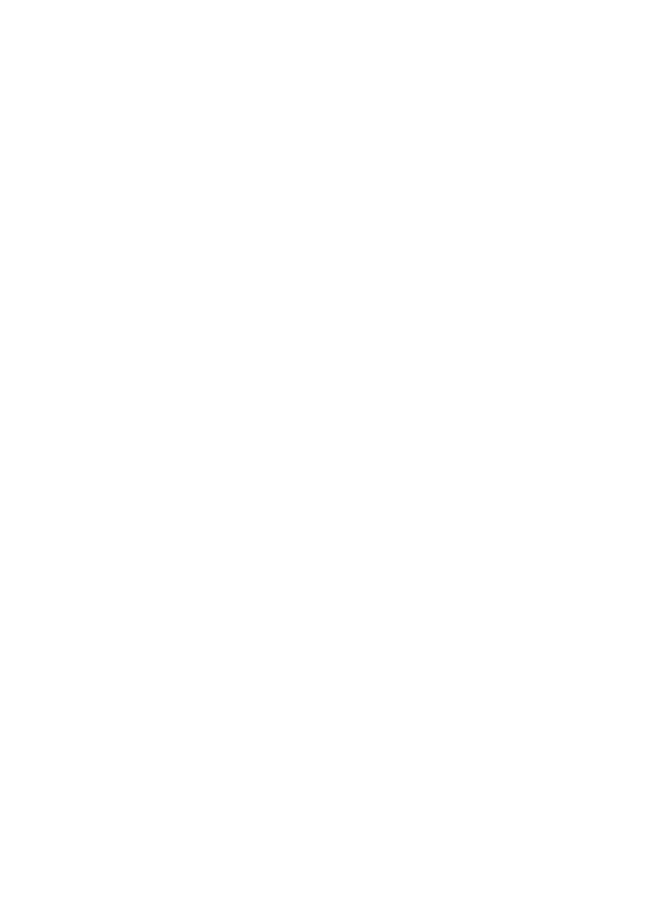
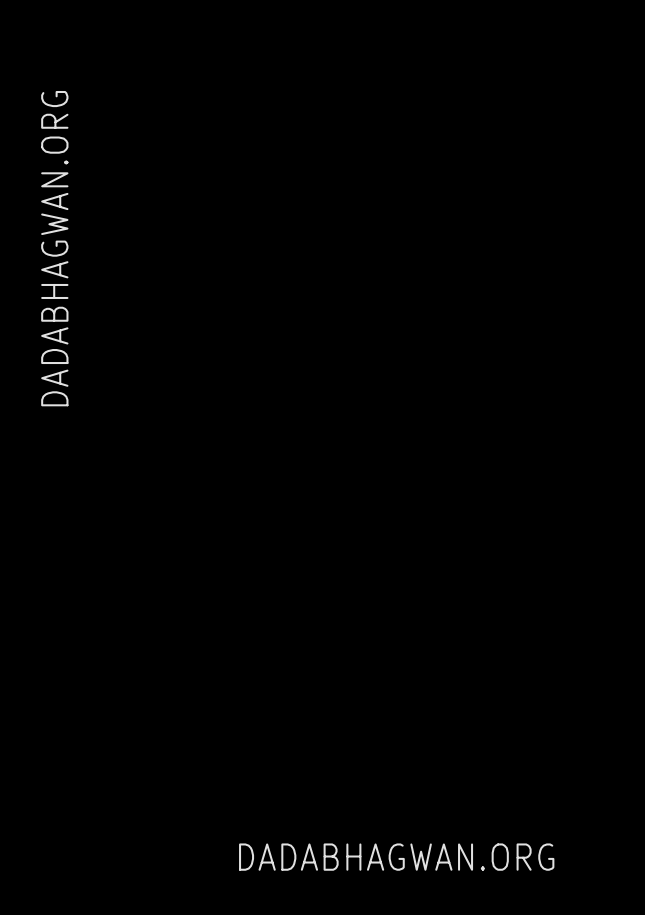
text: none -> DADABHAGWAN.ORG (54, 248)
text: none -> DADABHAGWAN.ORG (396, 857)

